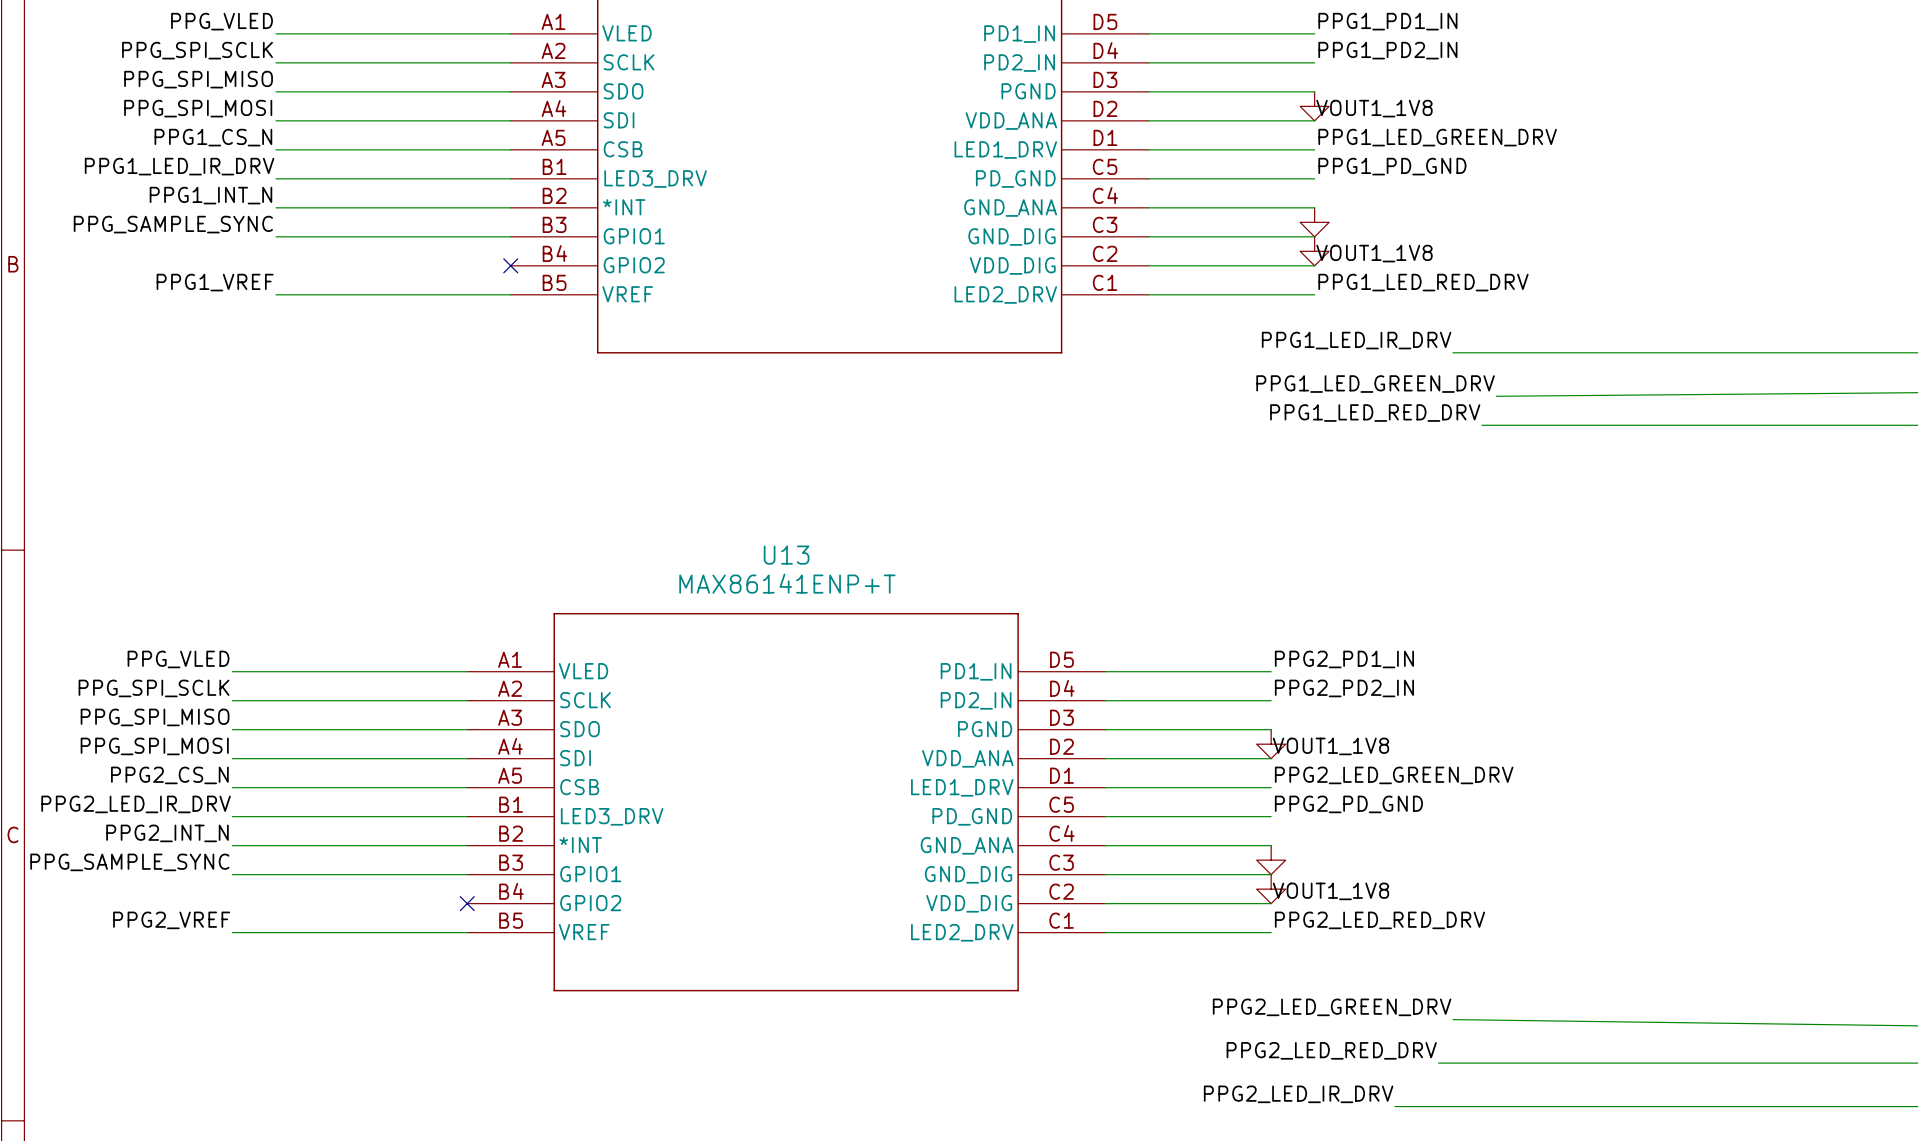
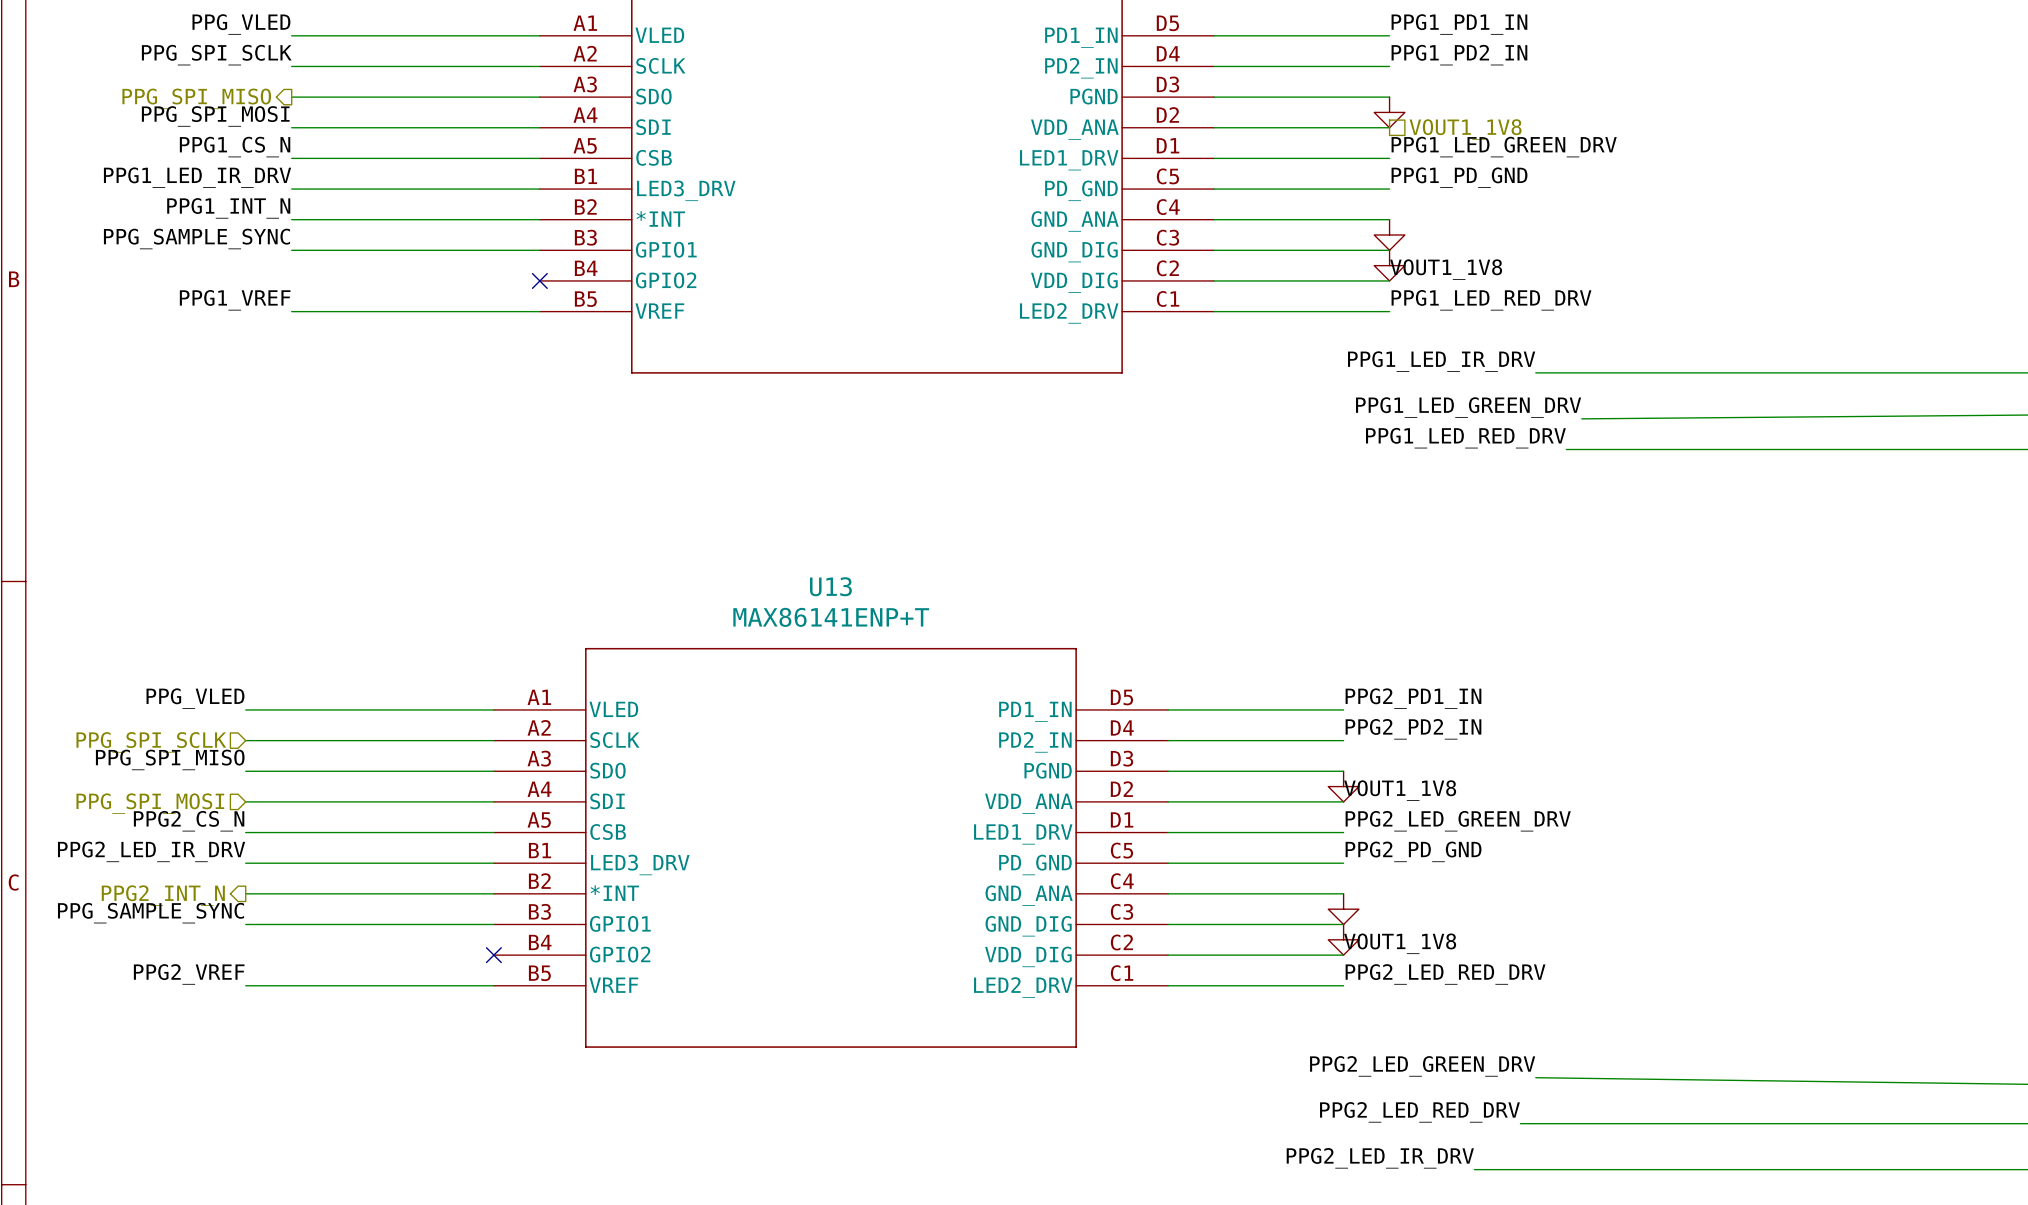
label: PPG_SPI_MISO (198, 79) -> none
hierarchical label: none -> PPG_SPI_MISO (196, 98)
label: VOUT1_1V8 (1374, 108) -> none
hierarchical label: none -> VOUT1_1V8 (1465, 129)
label: PPG_SPI_SCLK (154, 688) -> none
hierarchical label: none -> PPG_SPI_SCLK (151, 742)
label: PPG_SPI_MOSI (154, 746) -> none
hierarchical label: none -> PPG_SPI_MOSI (150, 803)
label: PPG2_INT_N (167, 833) -> none
hierarchical label: none -> PPG2_INT_N (163, 895)

